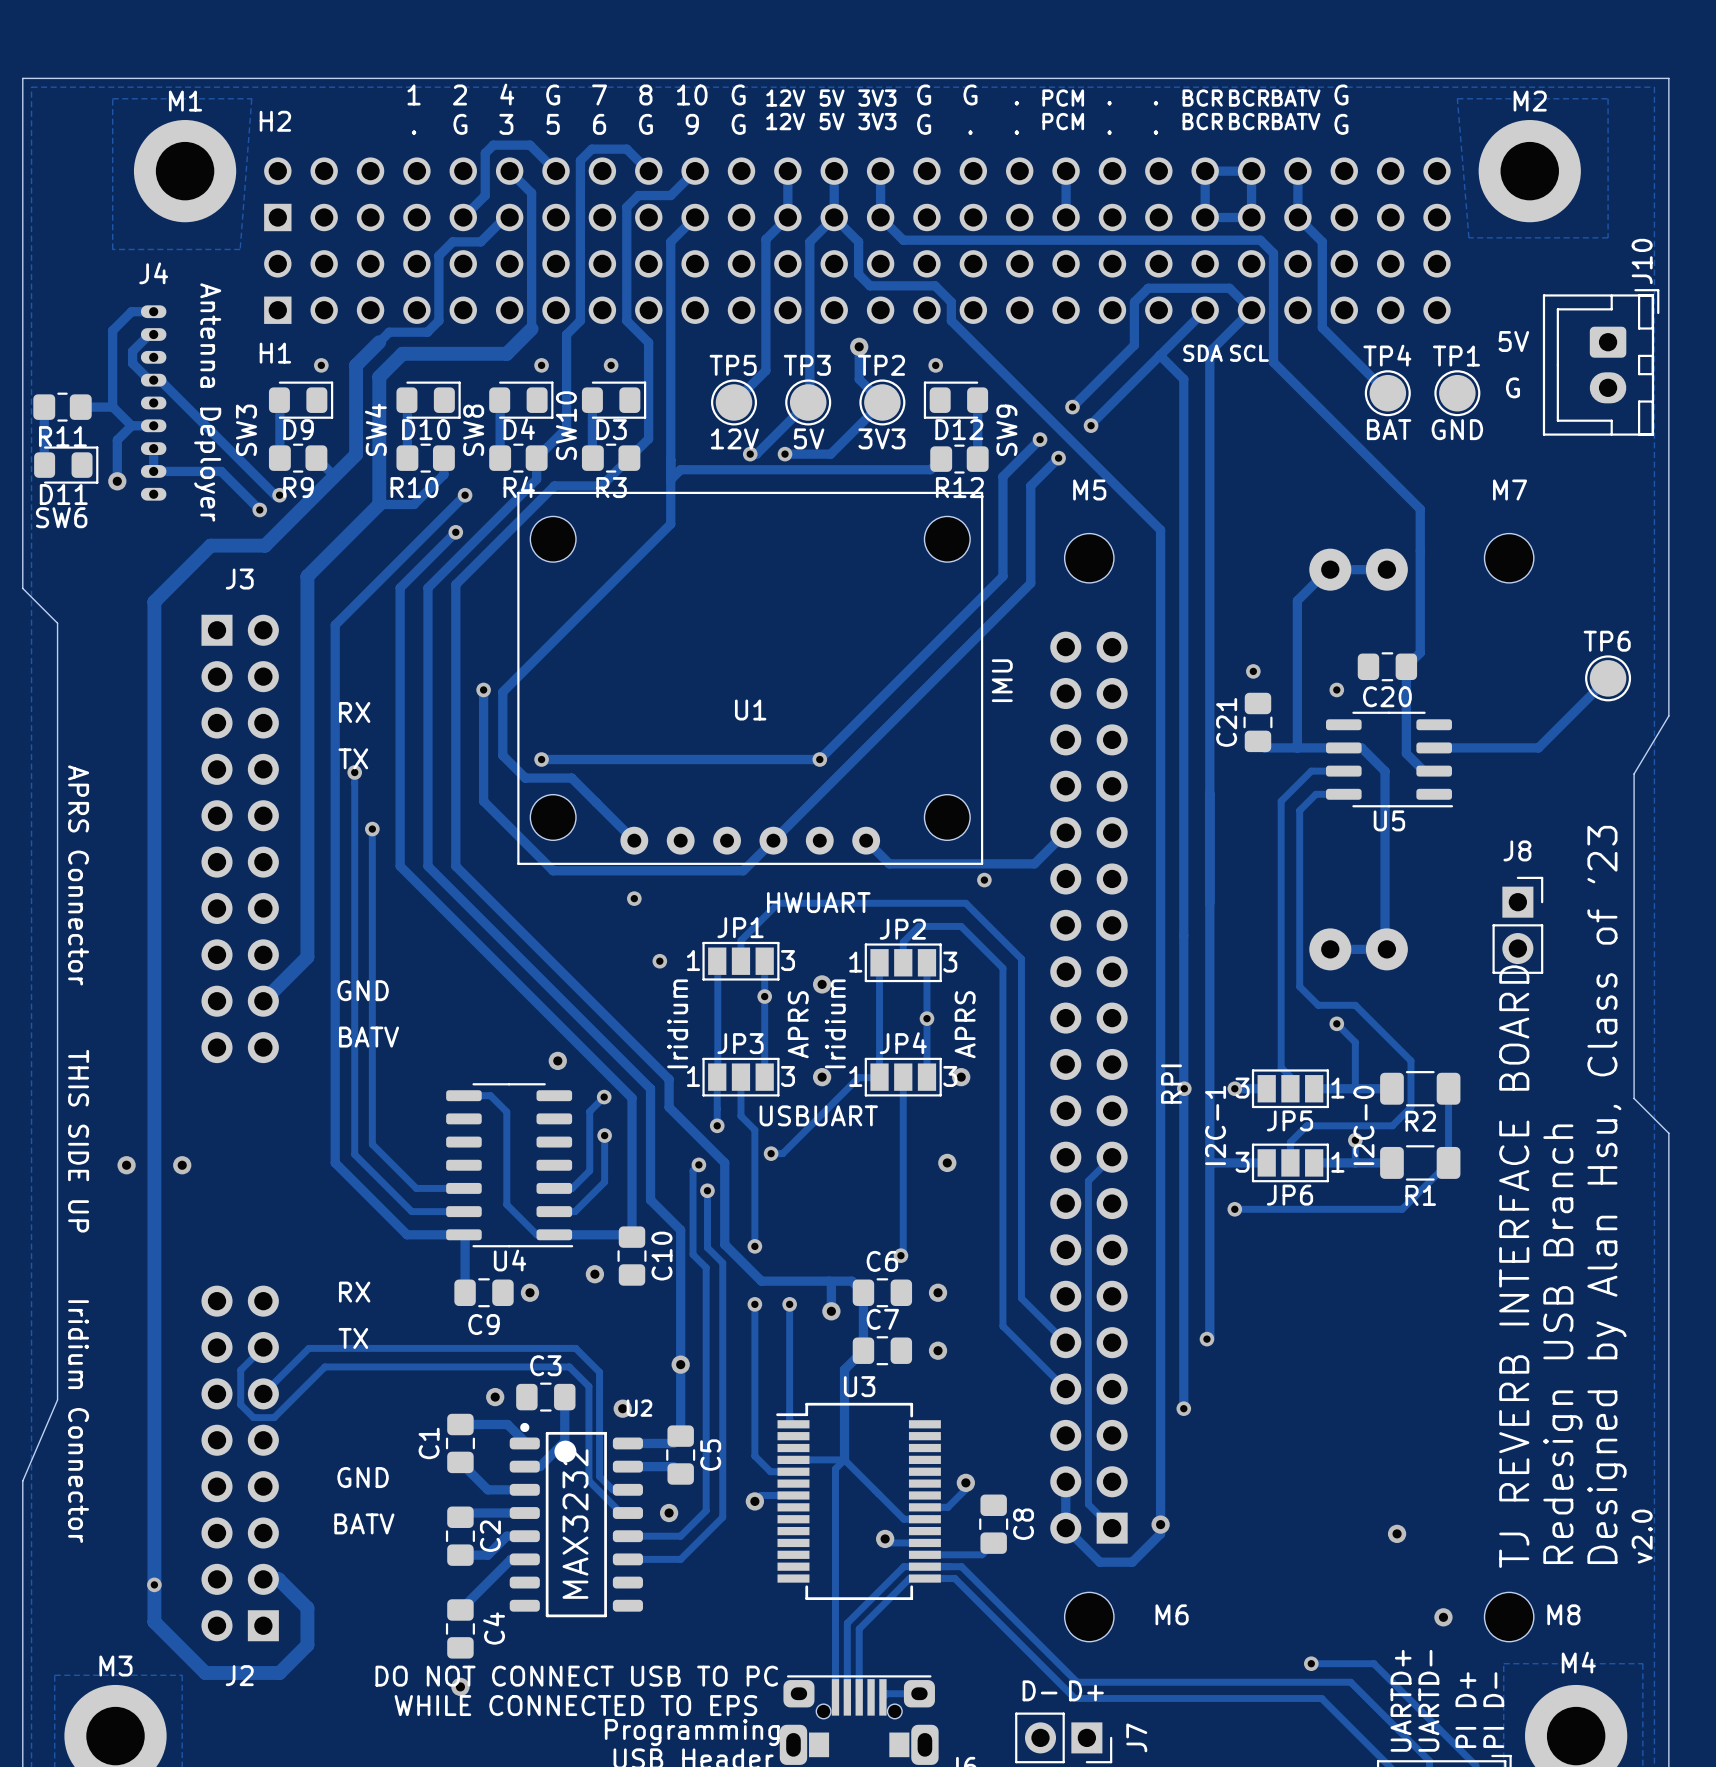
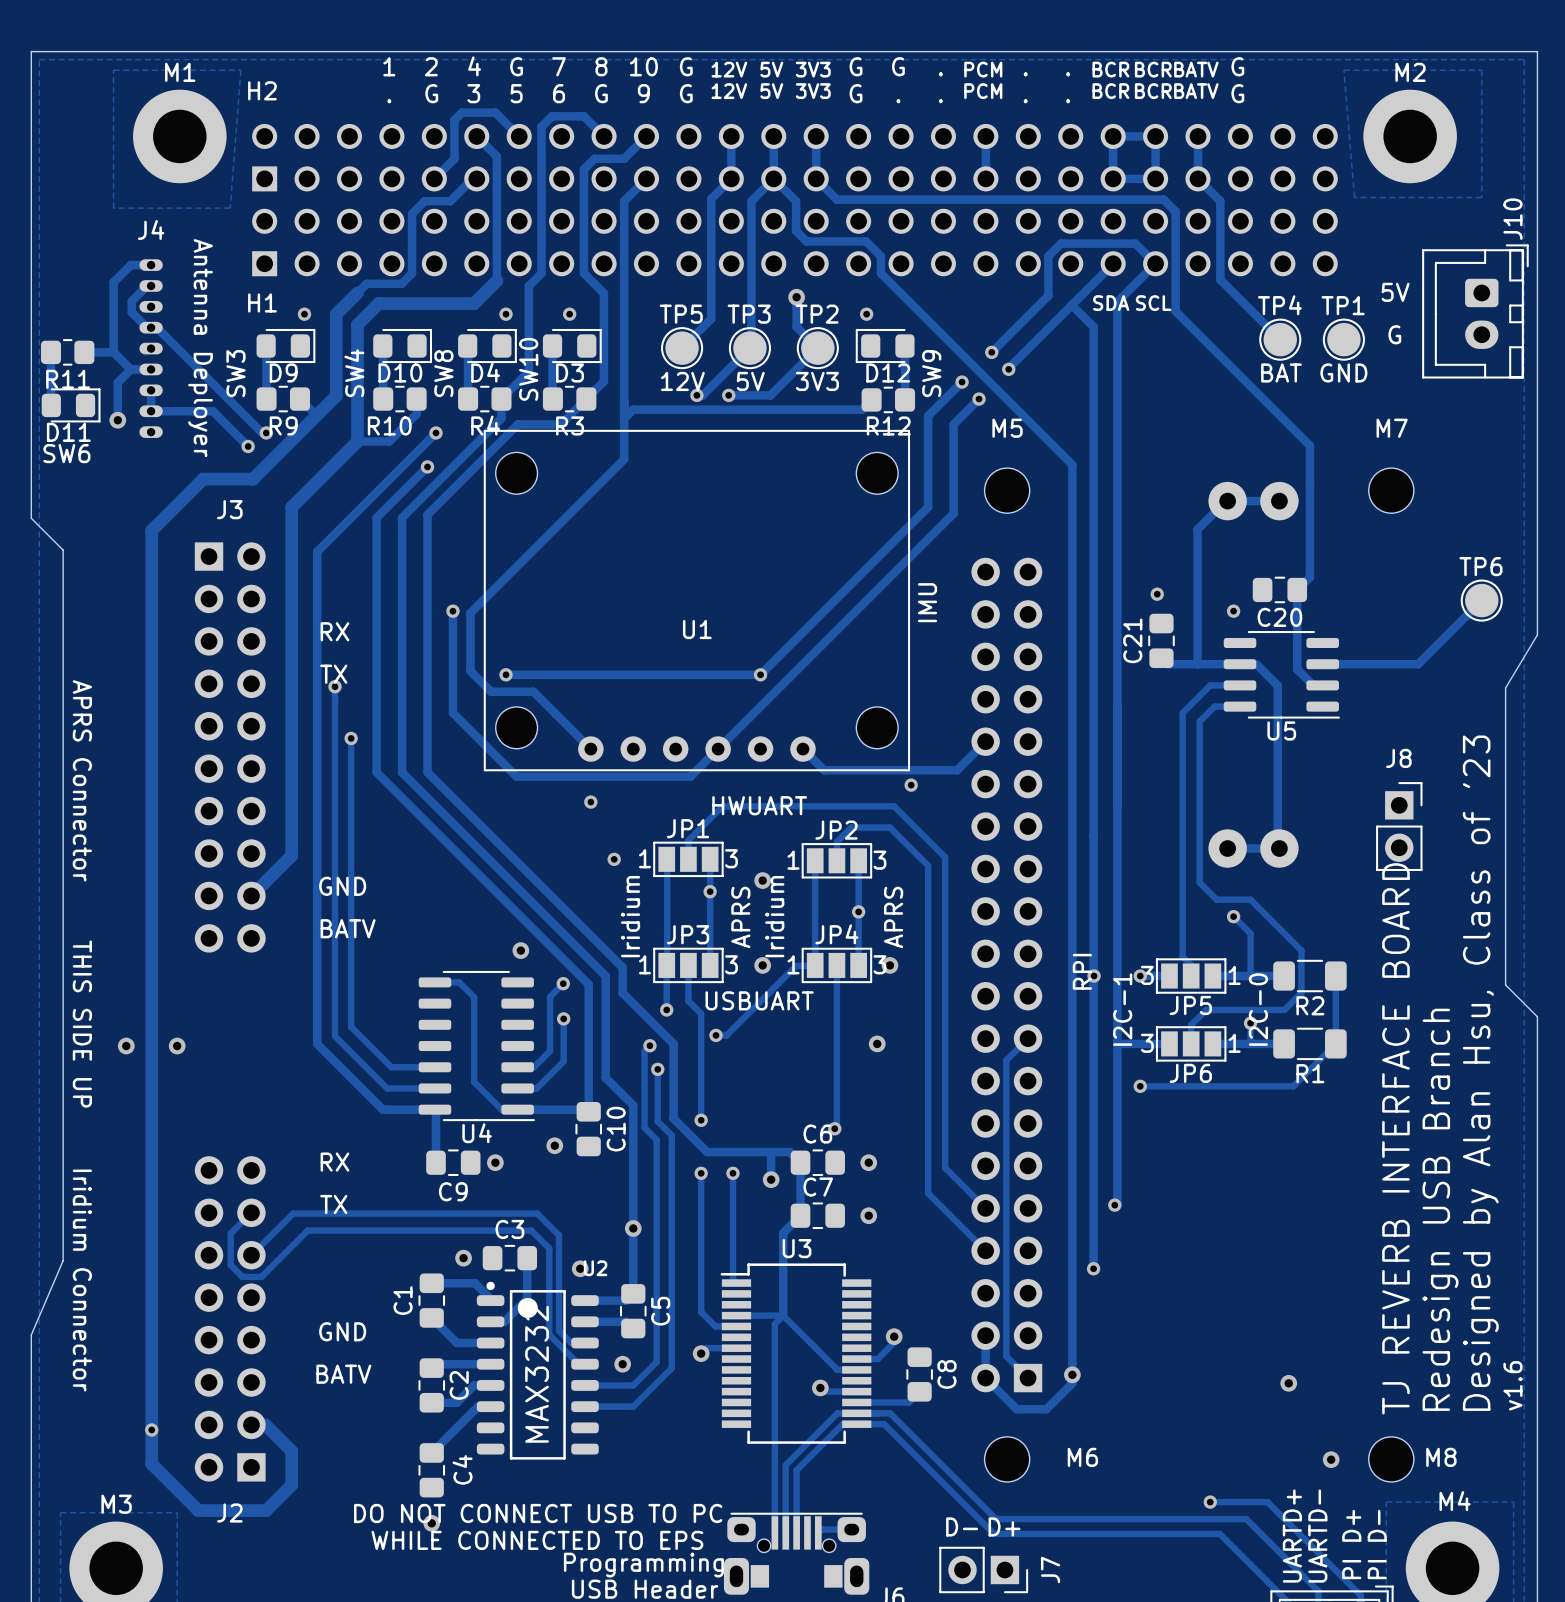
text: v2.0 (1642, 1536) -> v1.6 (1512, 1385)

